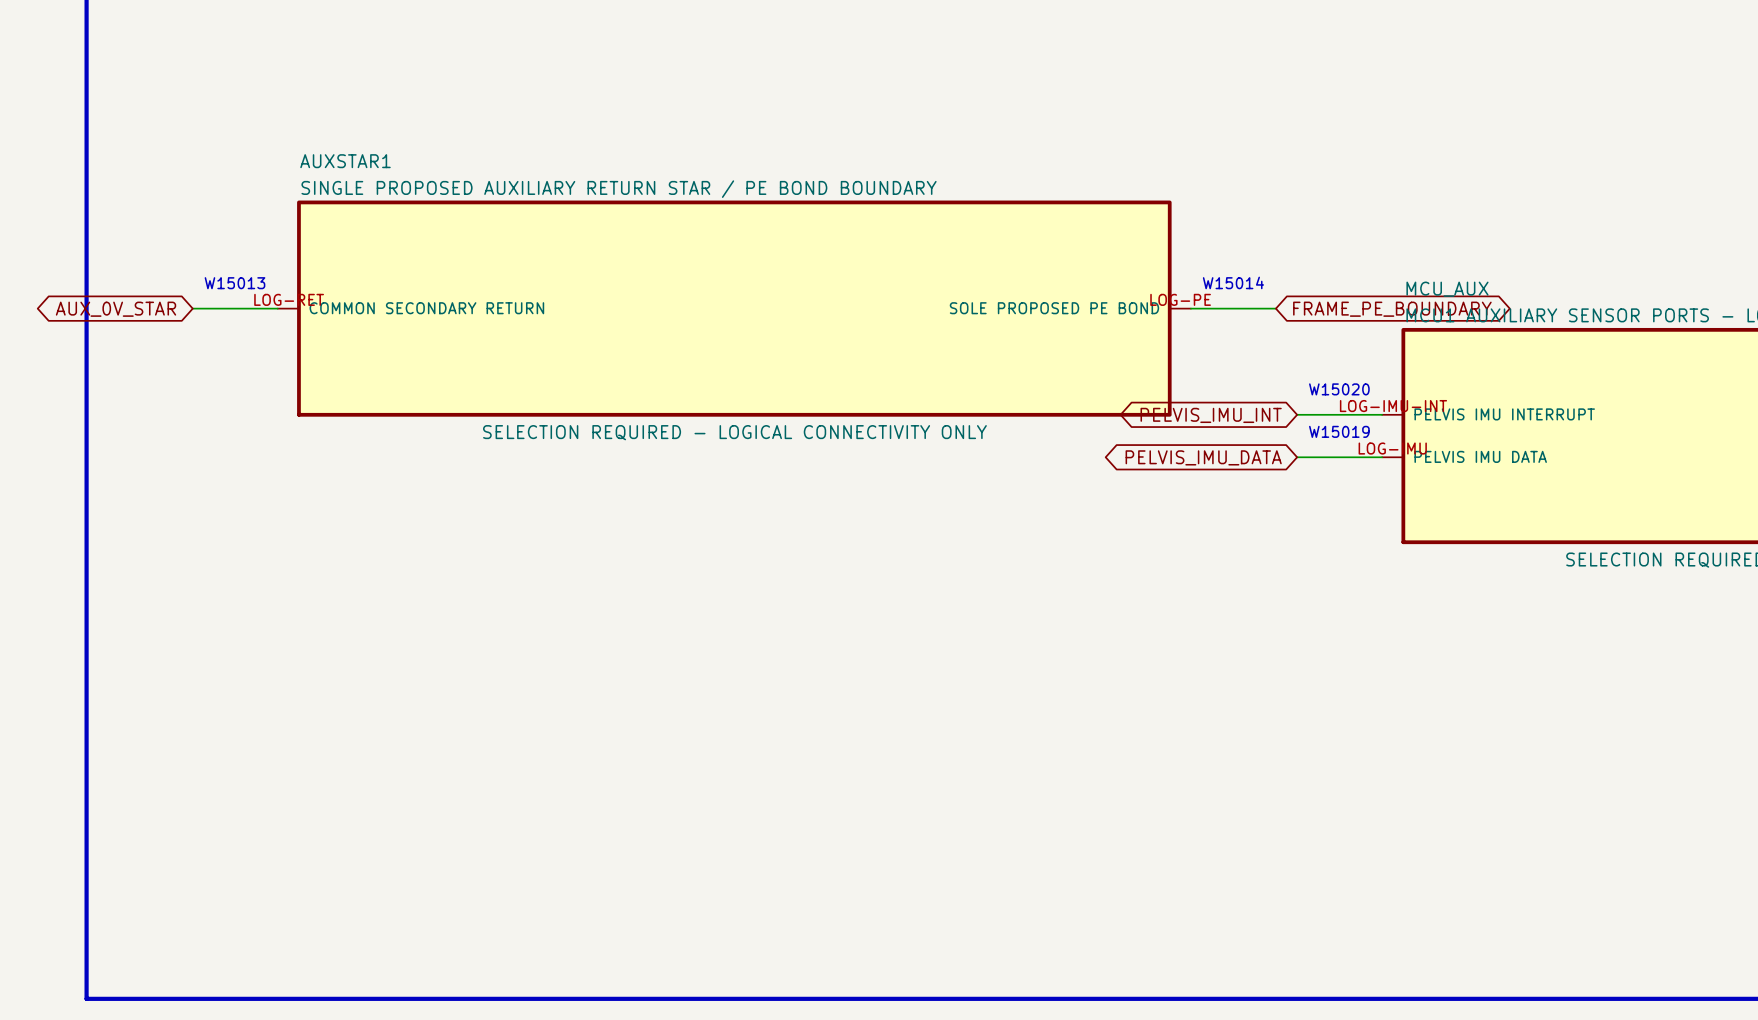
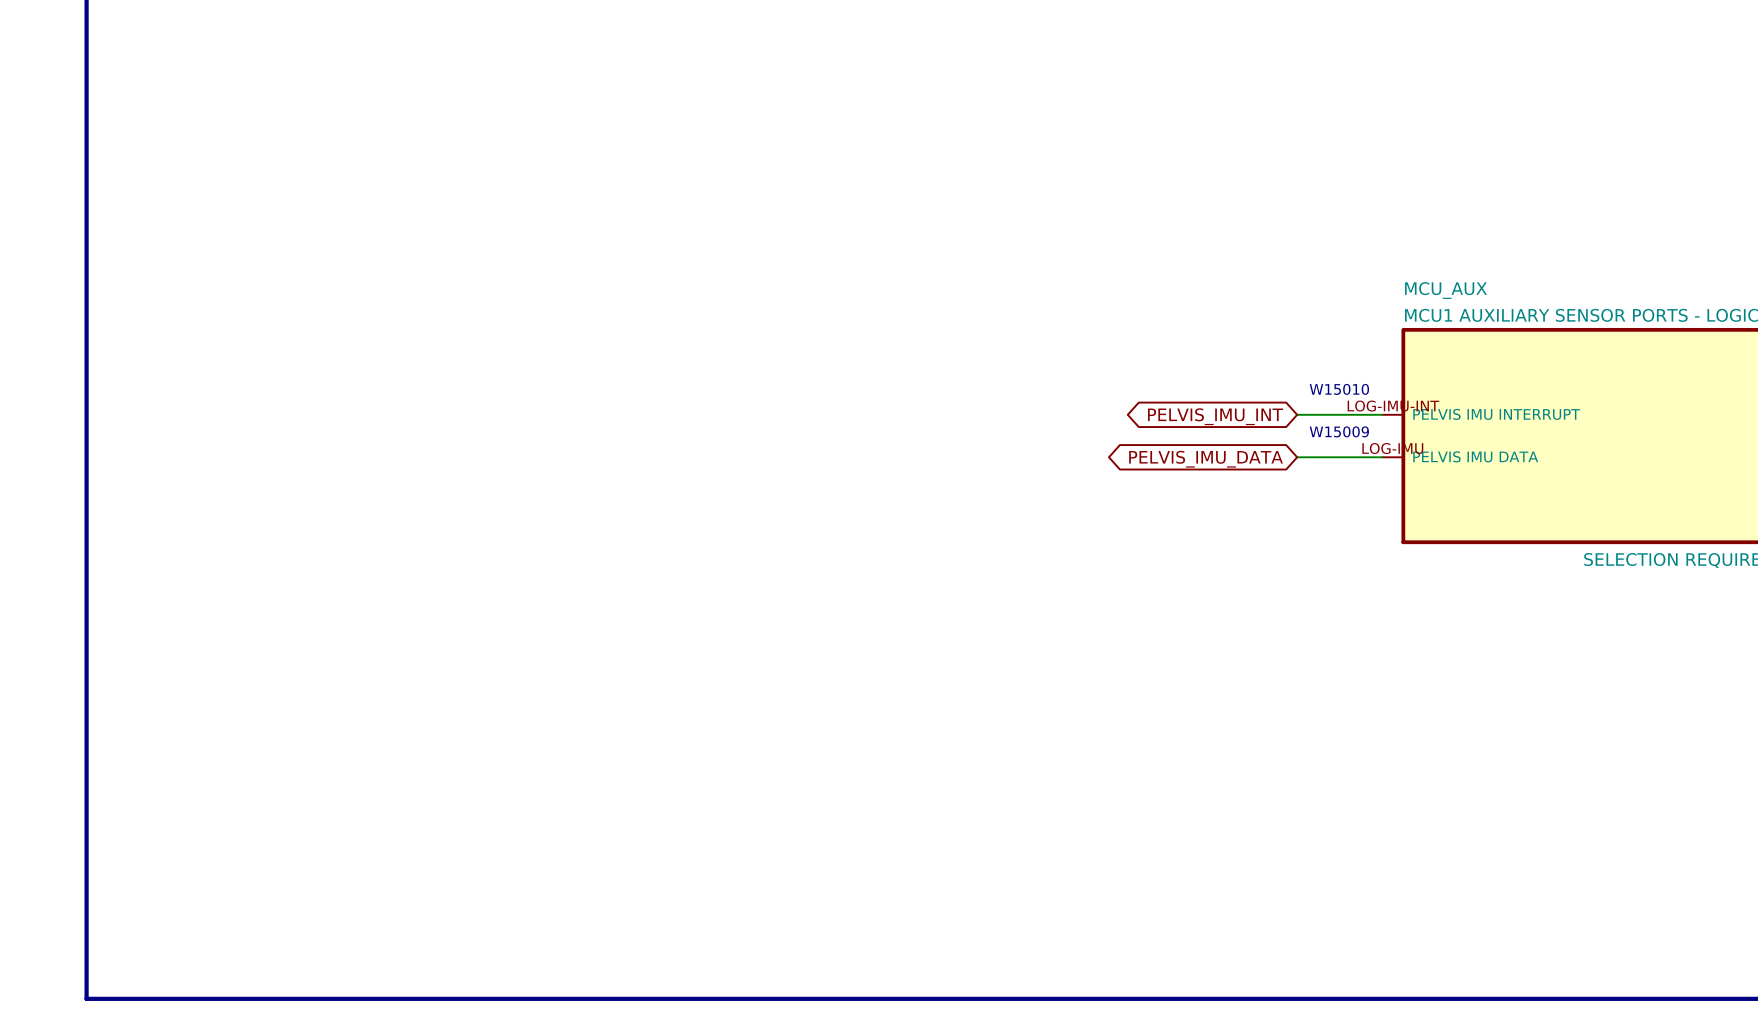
text: W15014 (1233, 282) -> none
text: W15013 (234, 283) -> none
wire: (192, 308) (277, 308) -> none
AUXSTAR1: (734, 308) -> none
wire: (1190, 308) (1275, 308) -> none
global label: AUX_0V_STAR (116, 309) -> none
global label: FRAME_PE_BOUNDARY (1392, 309) -> none
text: W15020 (1339, 389) -> W15010 (1339, 389)
text: W15019 (1339, 431) -> W15009 (1339, 431)

